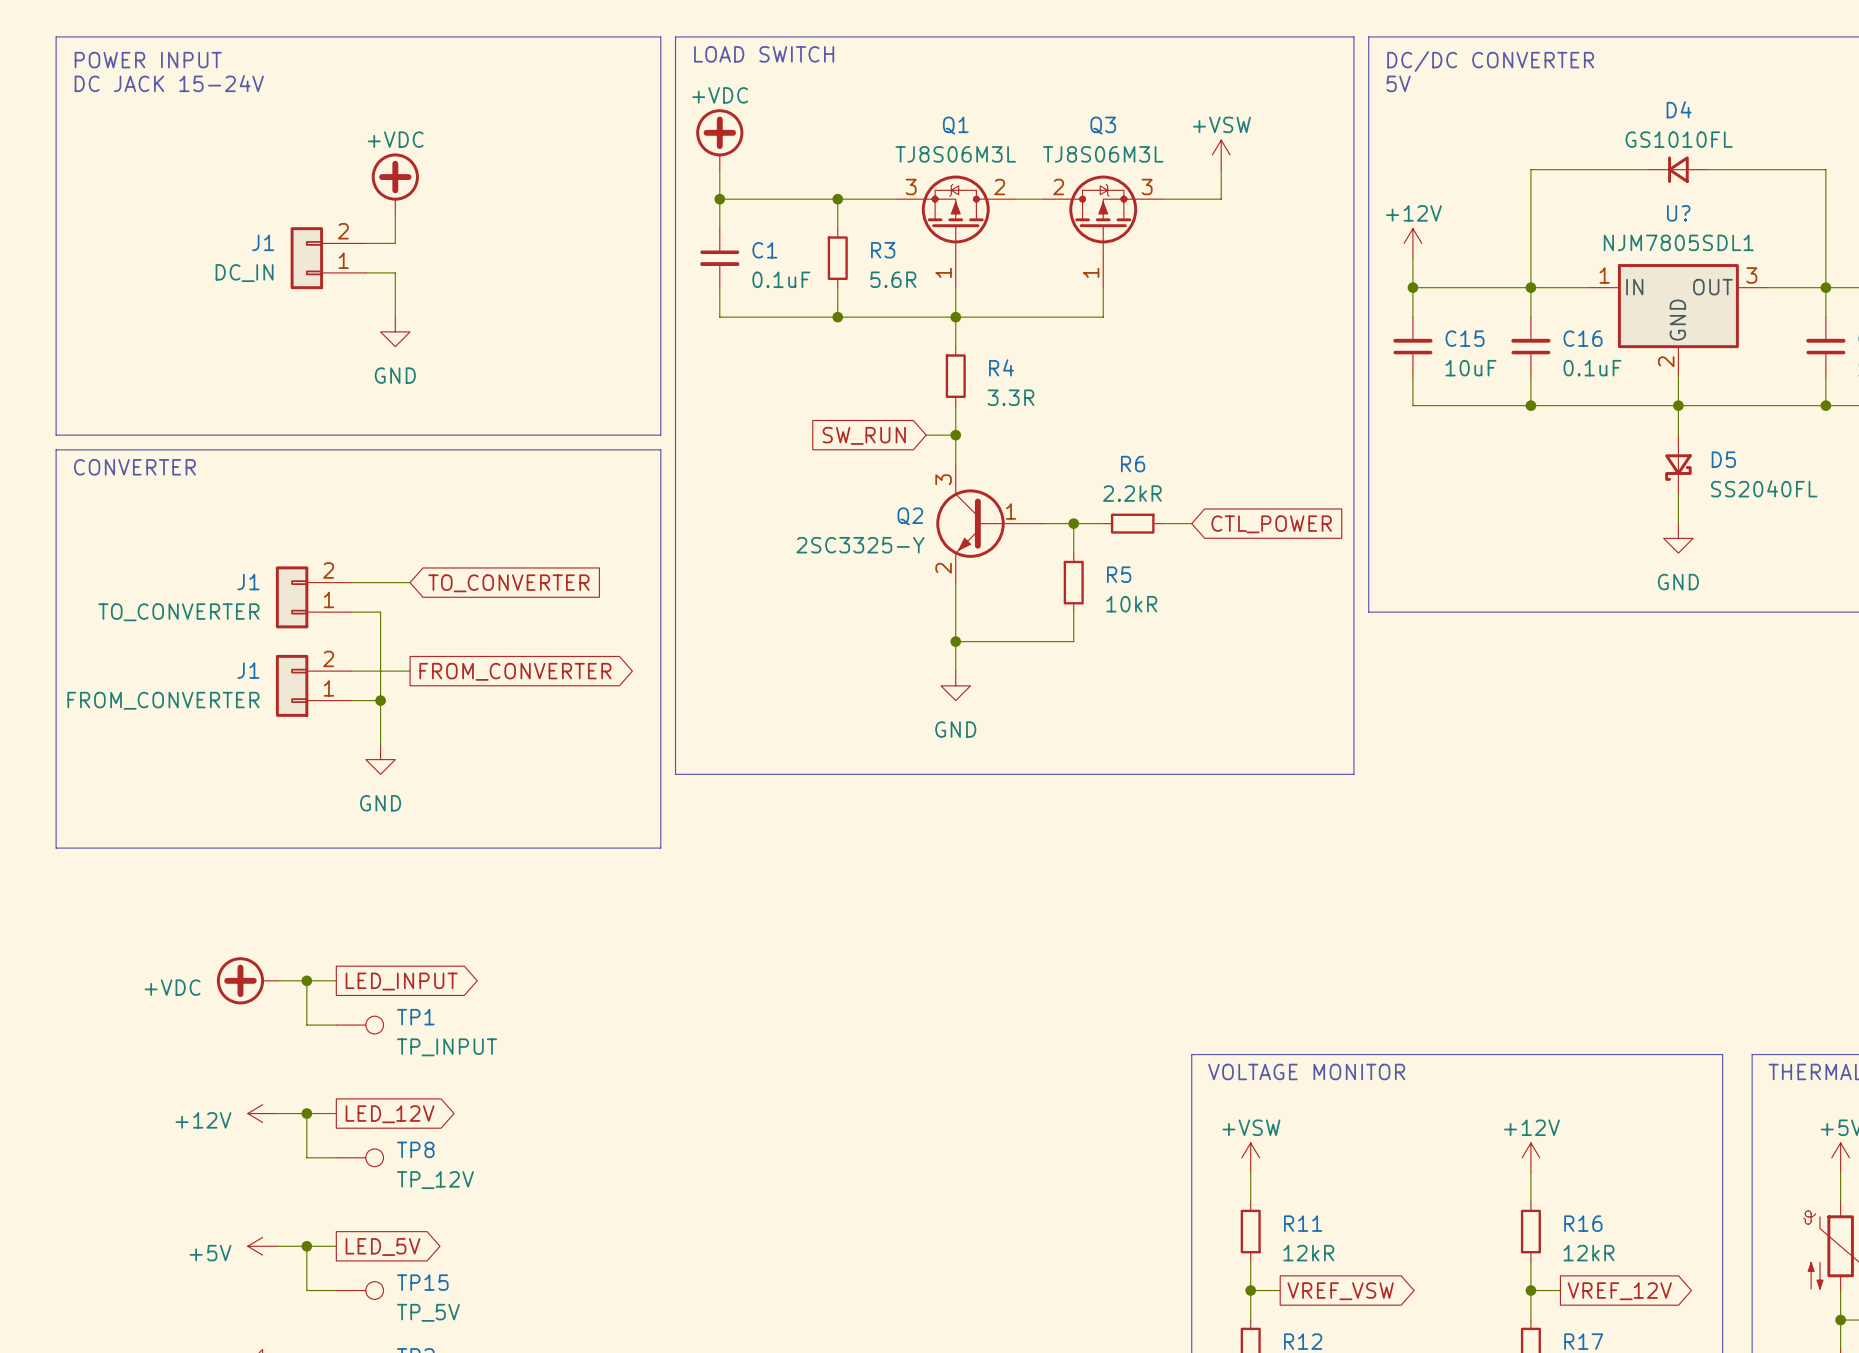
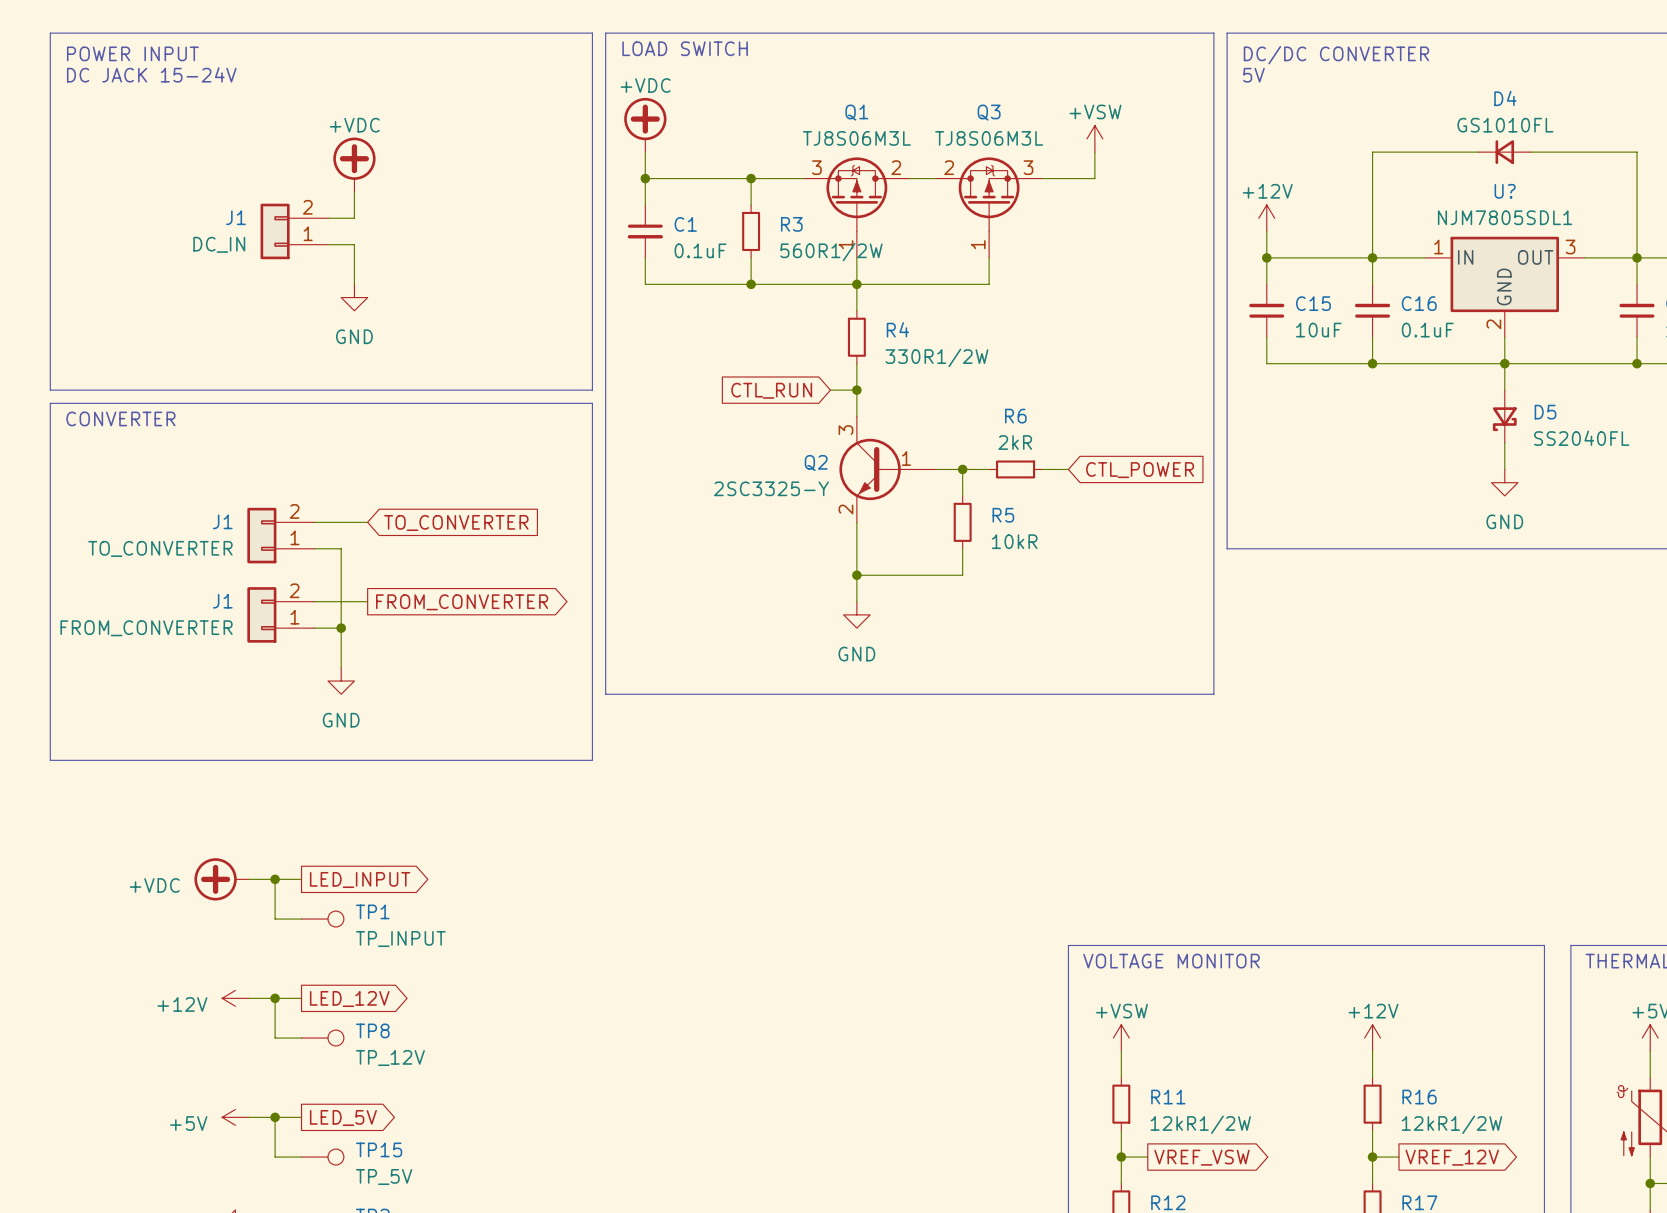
R3 value: 5.6R (893, 279) -> 560R1/2W (831, 252)
R4 value: 3.3R (1010, 397) -> 330R1/2W (936, 357)
global label: SW_RUN (864, 435) -> CTL_RUN (771, 390)
R6 value: 2.2kR (1132, 493) -> 2kR (1015, 442)
R11 value: 12kR (1308, 1253) -> 12kR1/2W (1200, 1124)
R16 value: 12kR (1588, 1253) -> 12kR1/2W (1451, 1124)

